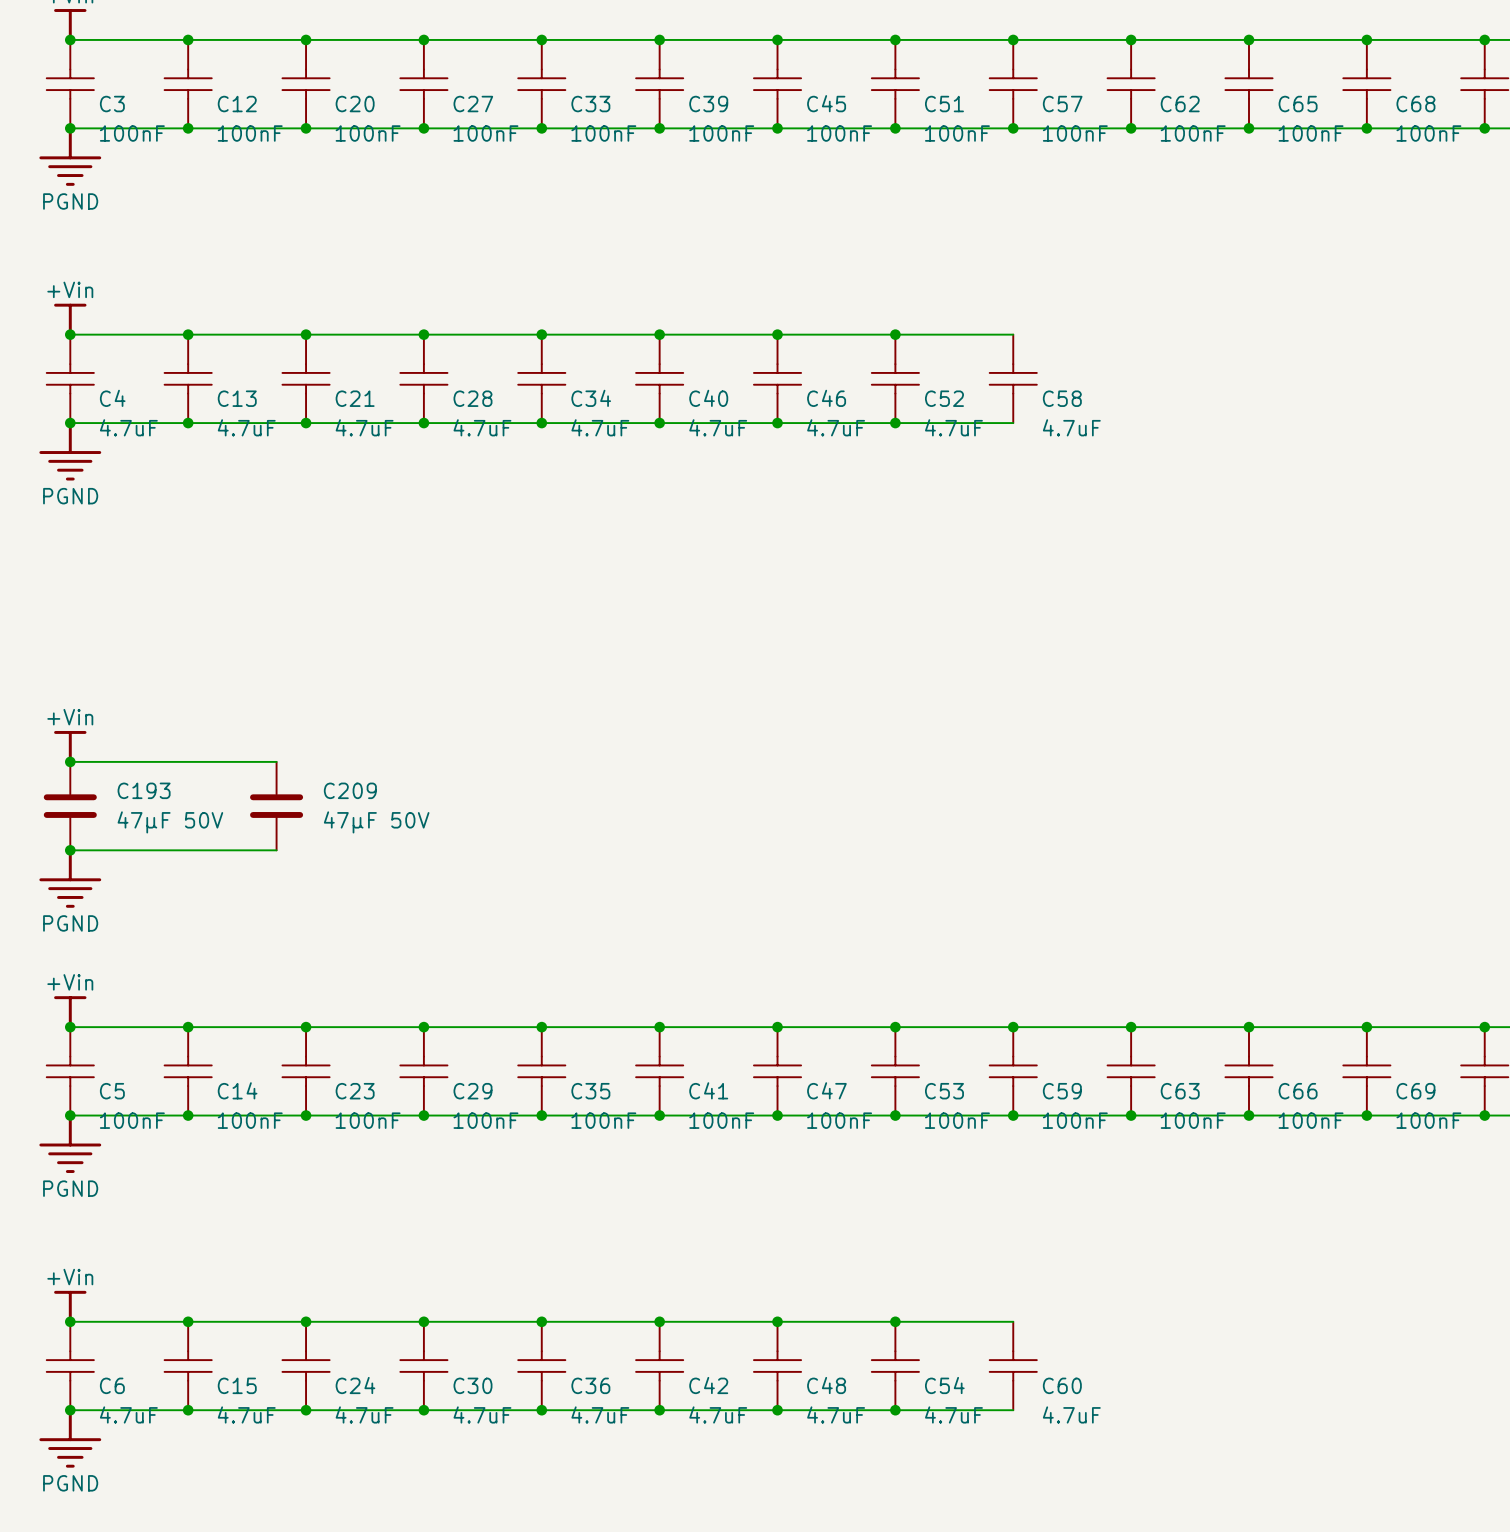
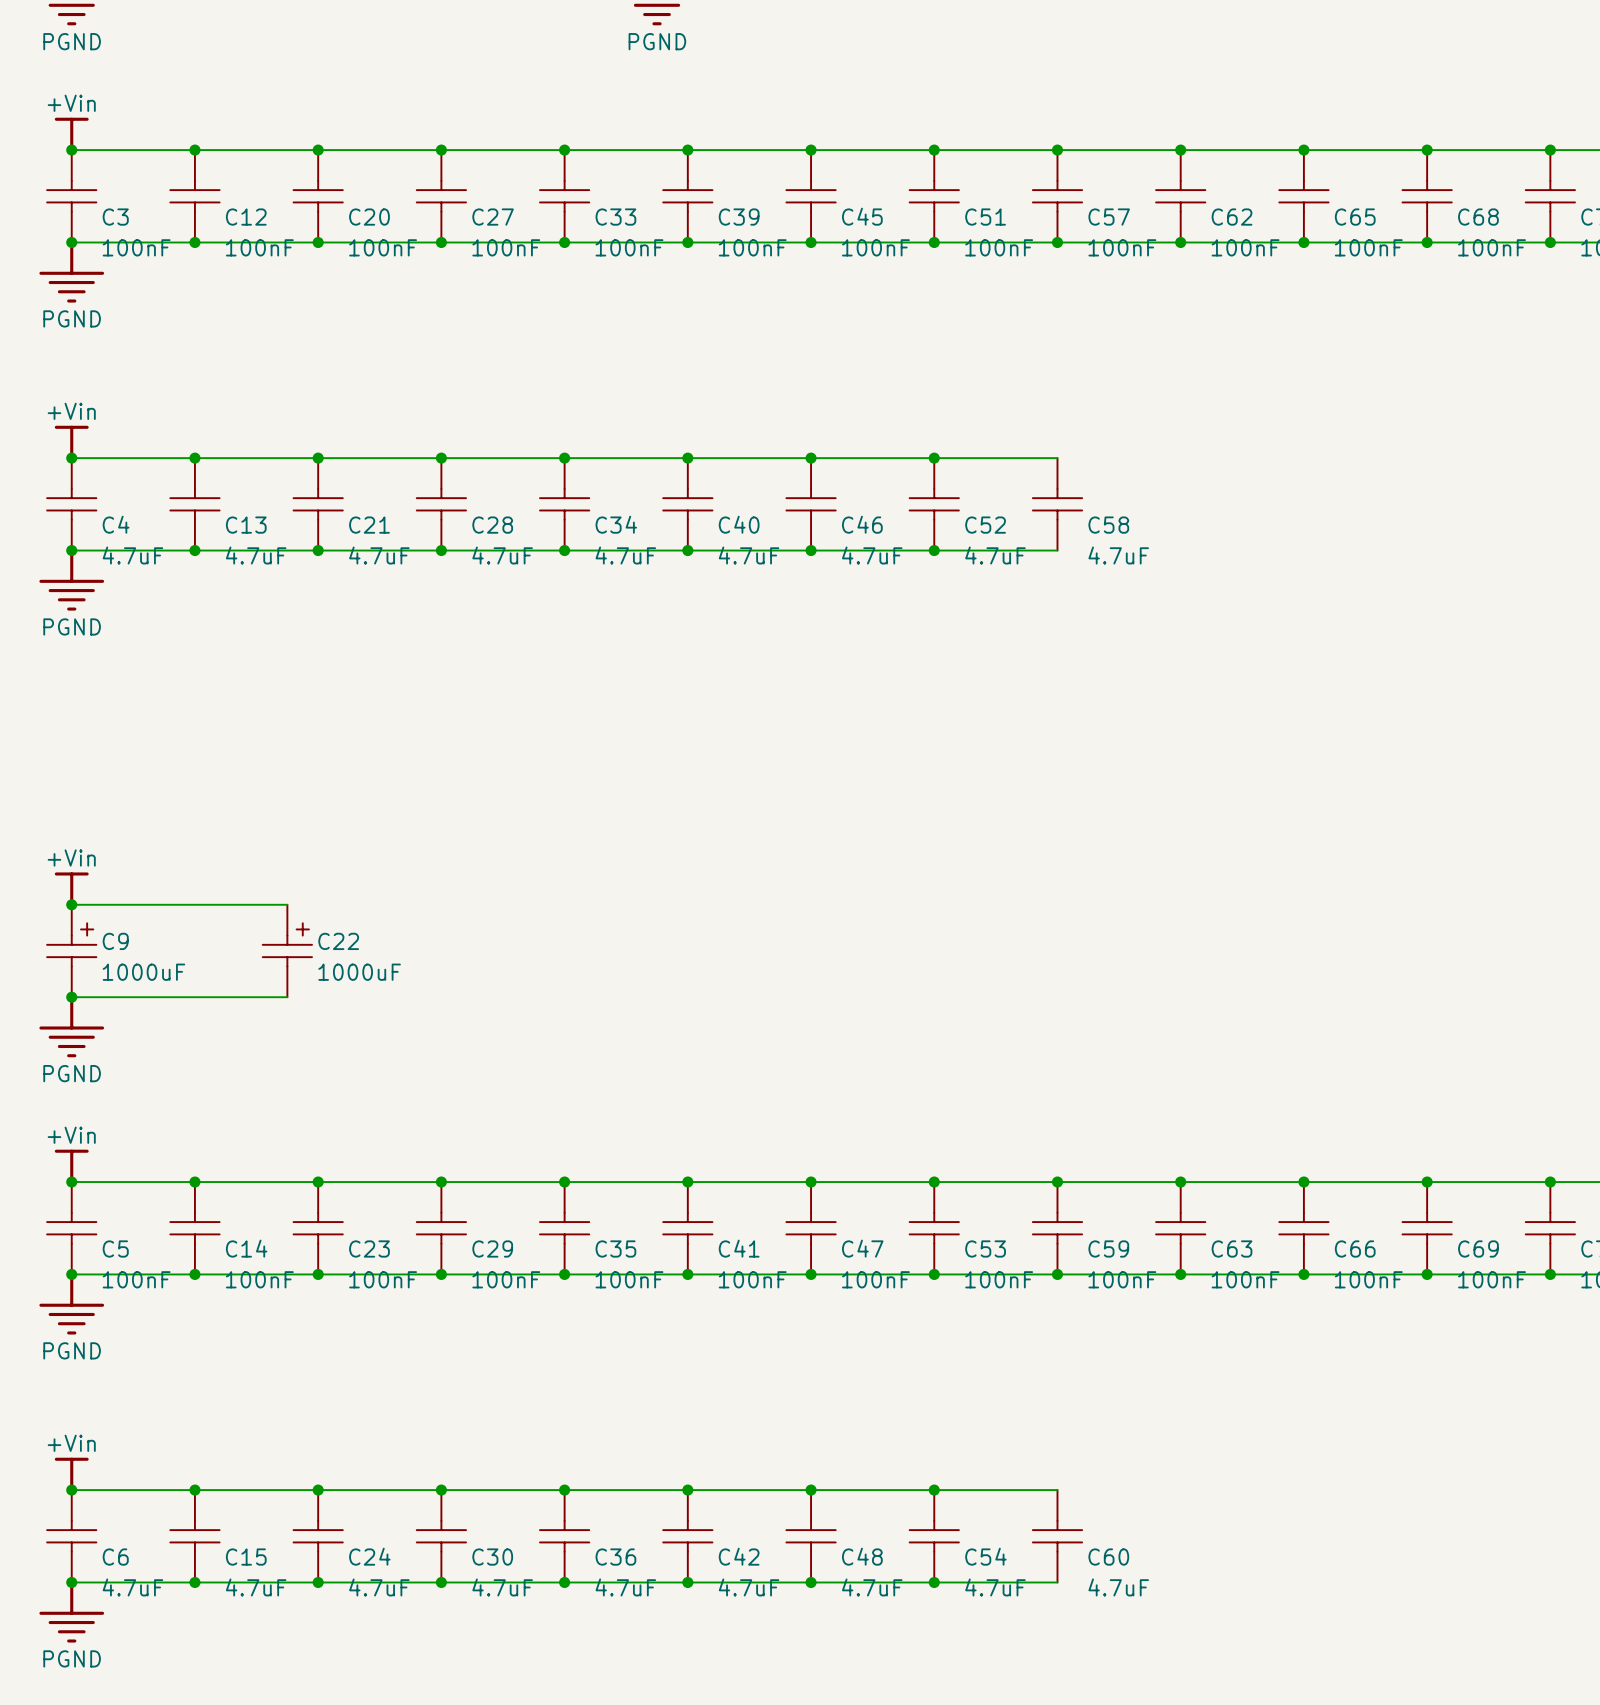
C193: 47µF 50V (70, 806) -> none
C9: none -> (71, 950)
C209: 47µF 50V (276, 806) -> none
C22: none -> (287, 950)

